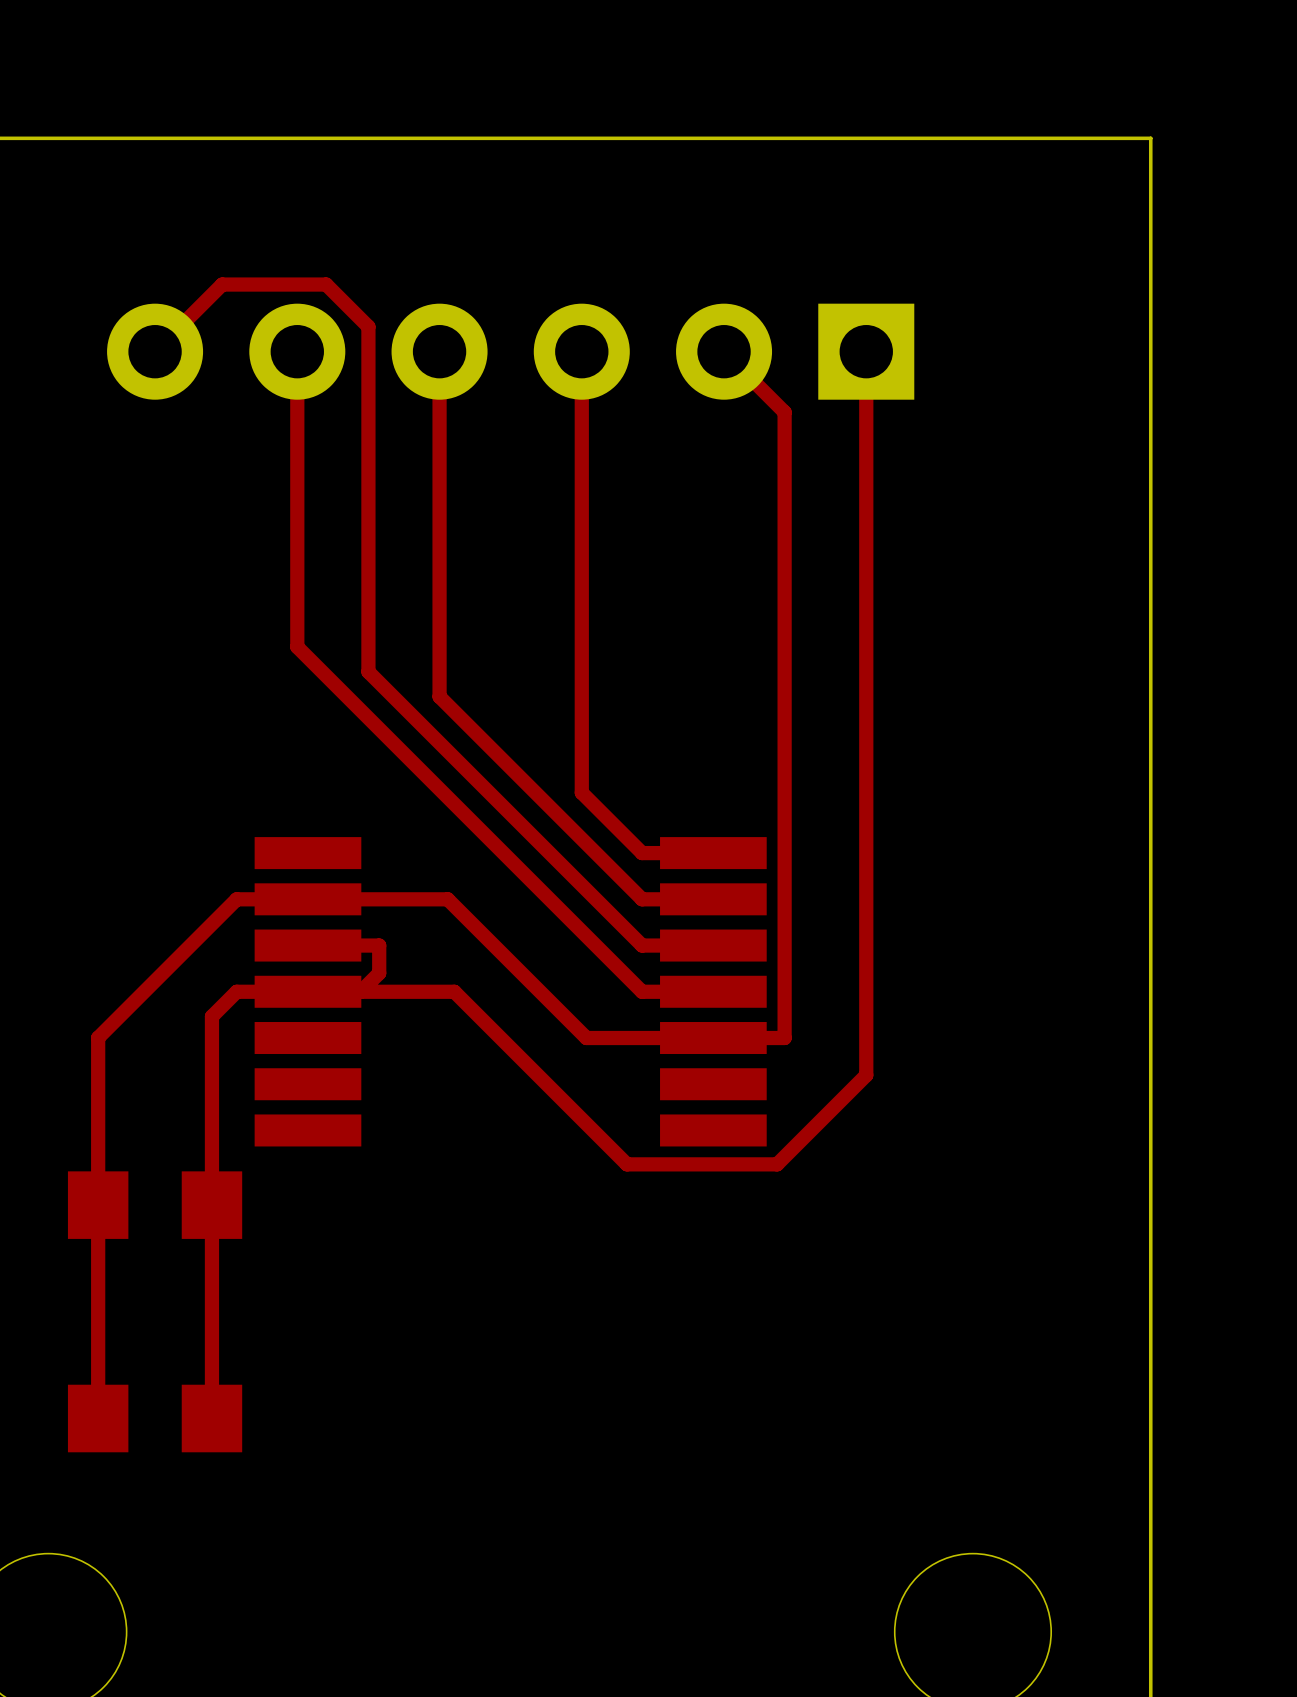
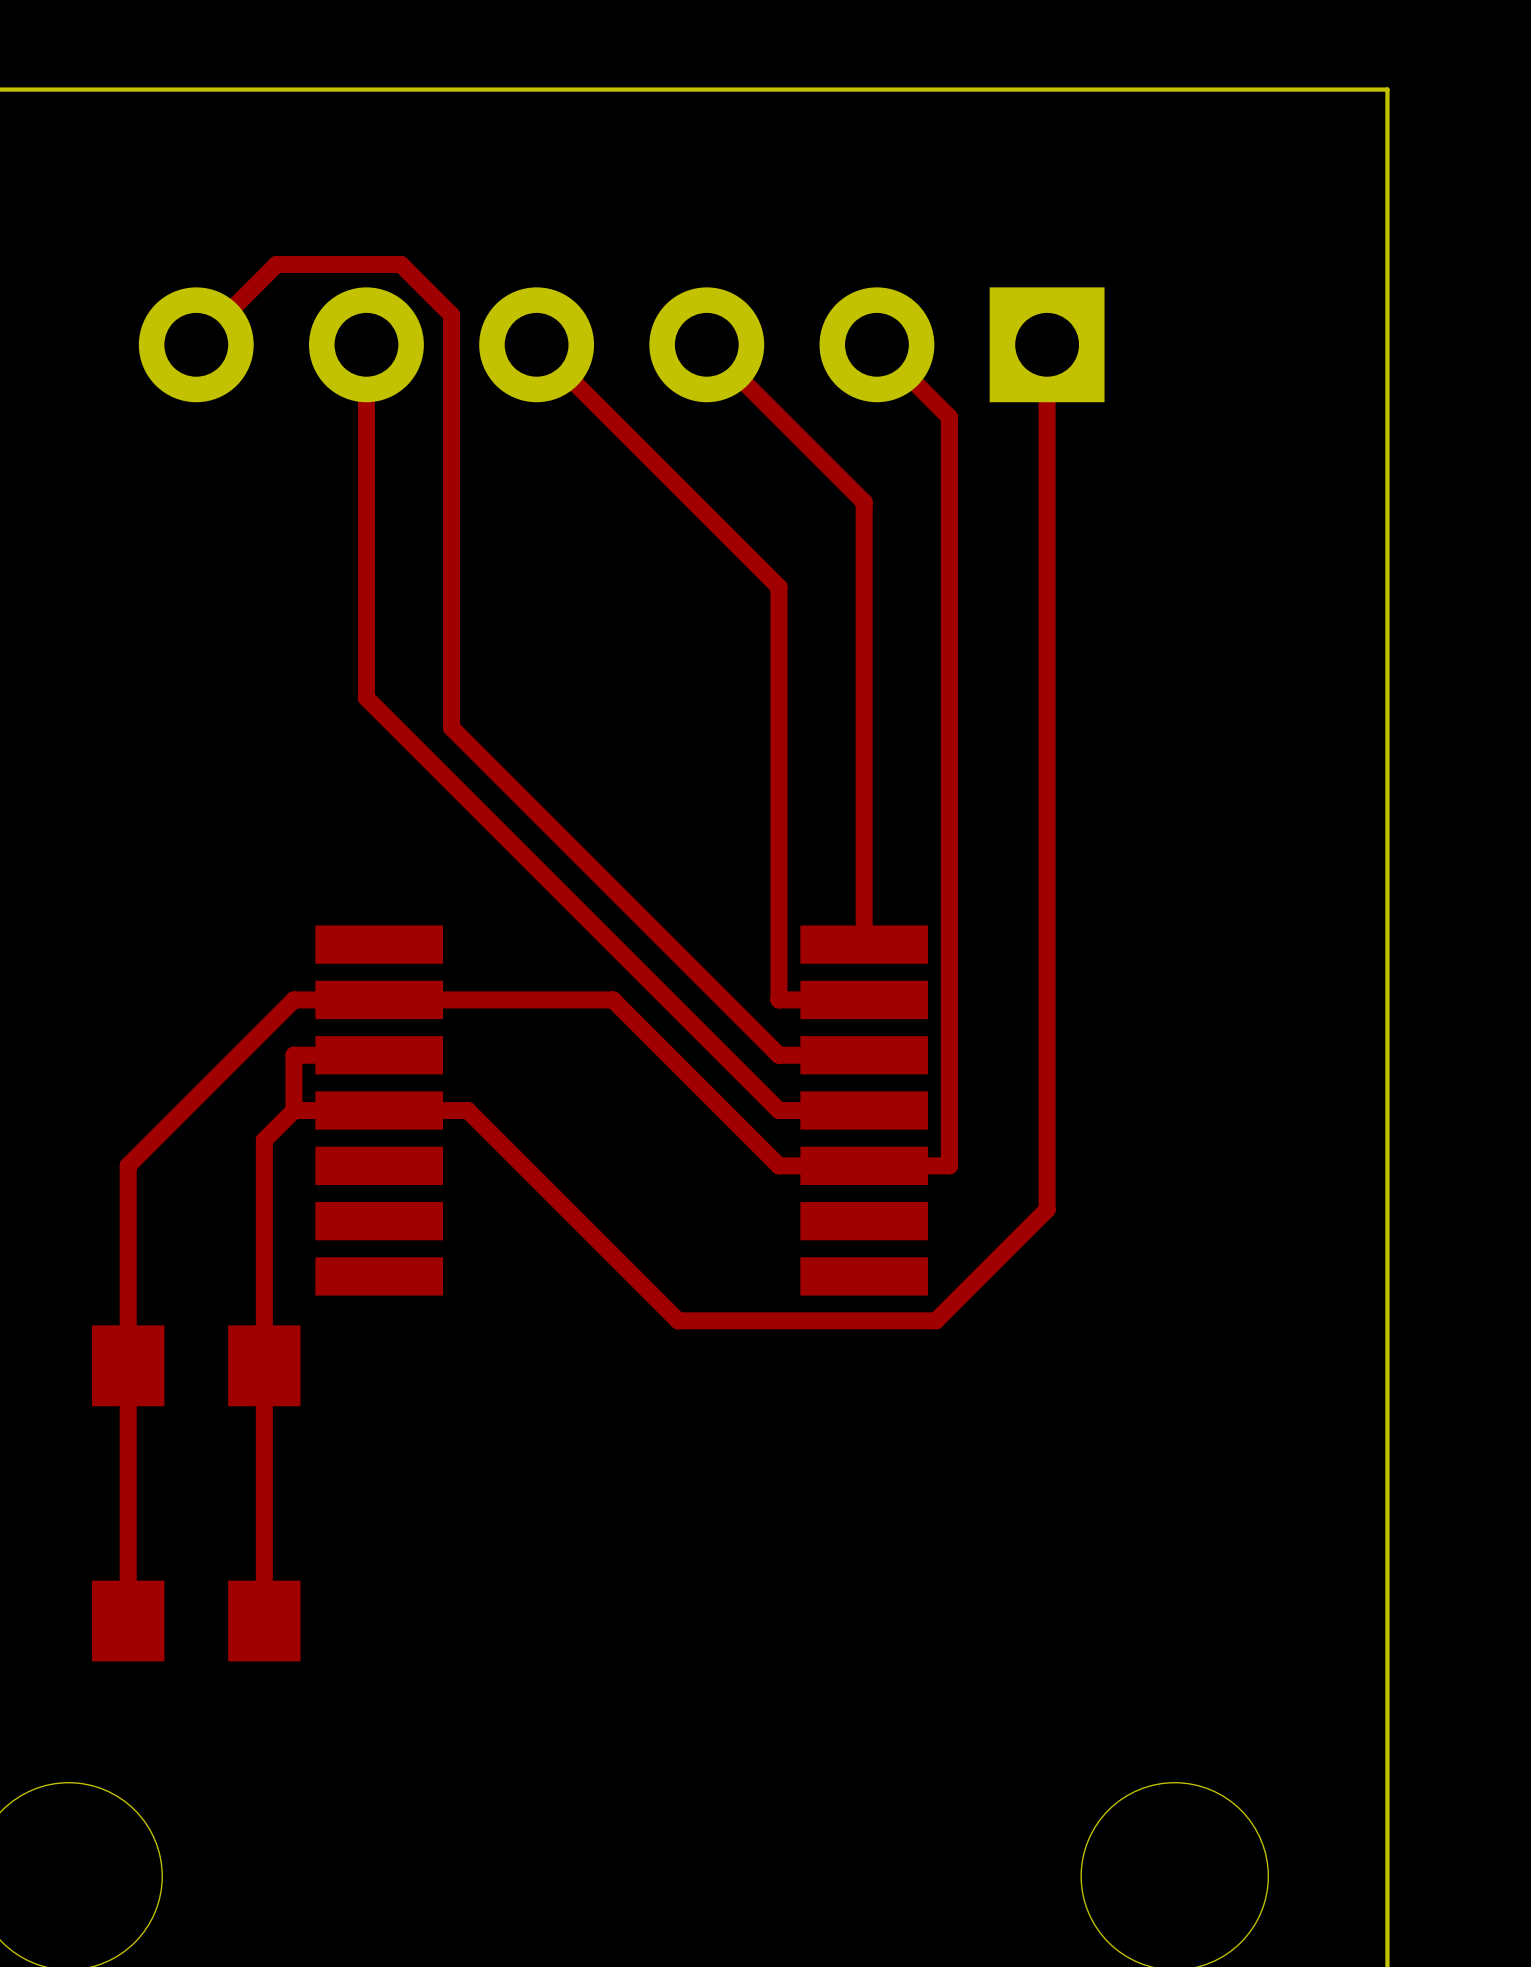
top track: (439, 351) (439, 696) (642, 899) -> (536, 344) (778, 587) (778, 999)
top track: (581, 351) (581, 792) (642, 853) (713, 853) -> (706, 344) (864, 502) (864, 944)
top track: (447, 899) (586, 1038) (642, 1038) -> (546, 999) (613, 999) (778, 1165)
top track: (307, 945) (379, 945) (379, 973) (360, 991) -> (379, 1055) (293, 1055) (293, 1110)
top track: (382, 991) (454, 991) (626, 1164) (777, 1164) (866, 1075) -> (467, 1110) (678, 1320) (935, 1320) (1047, 1209)

